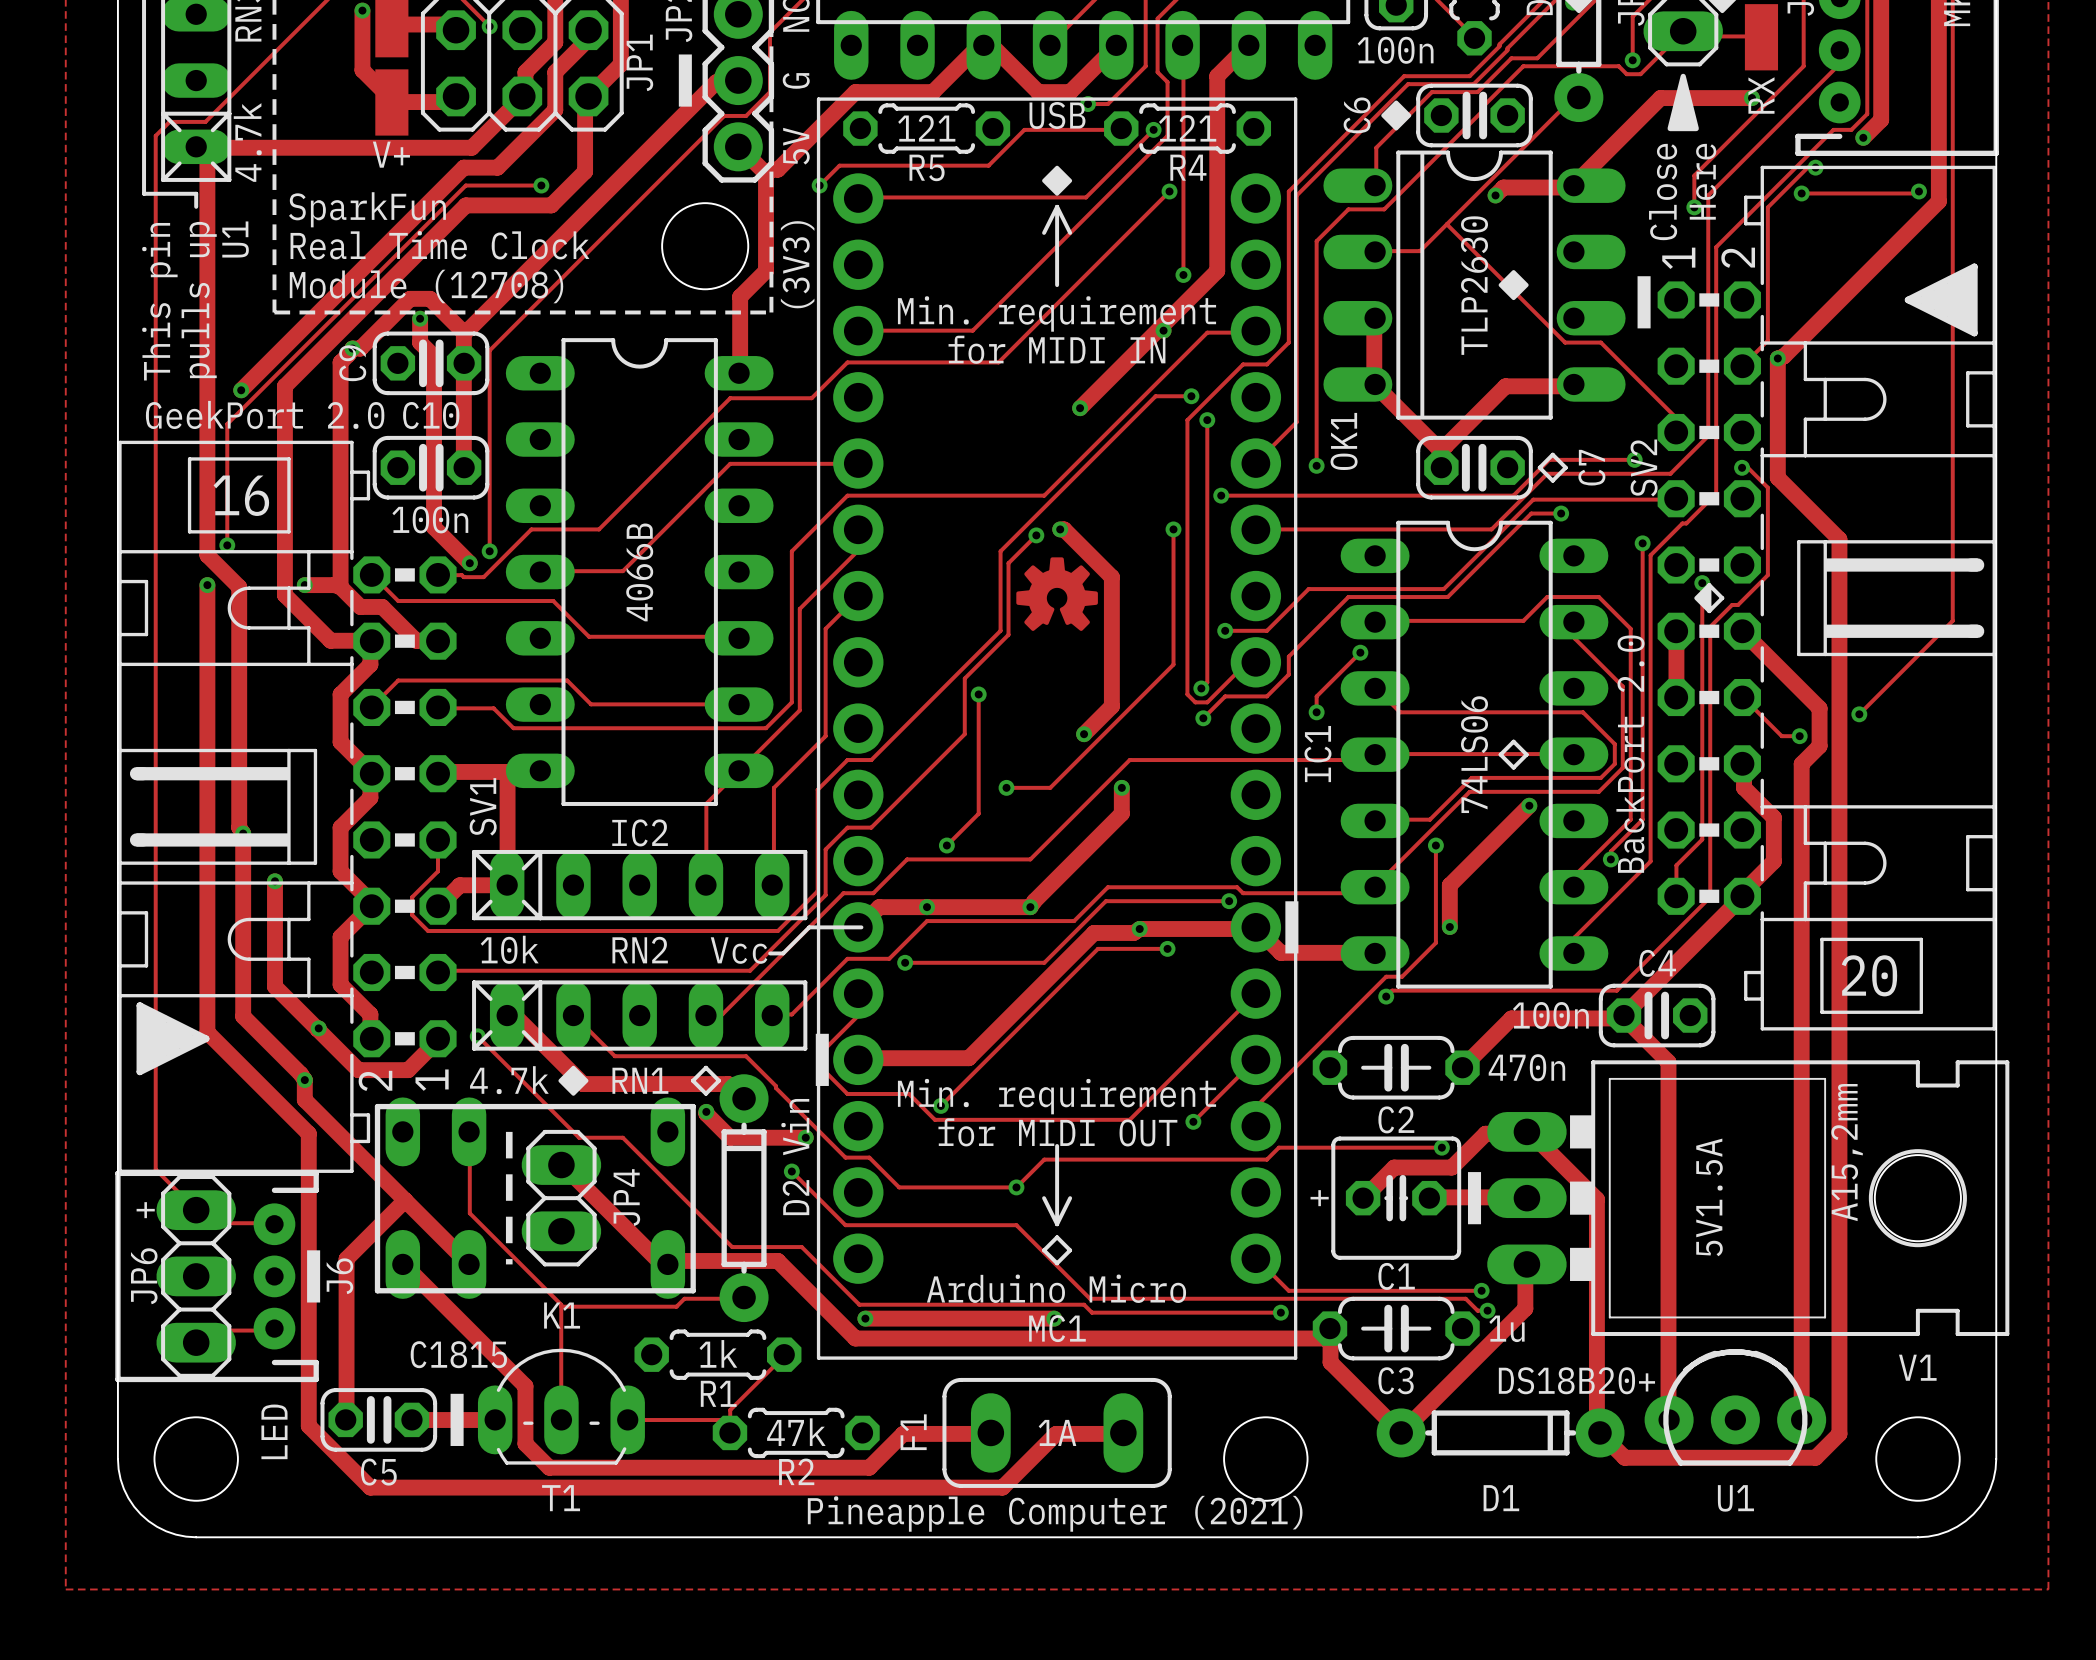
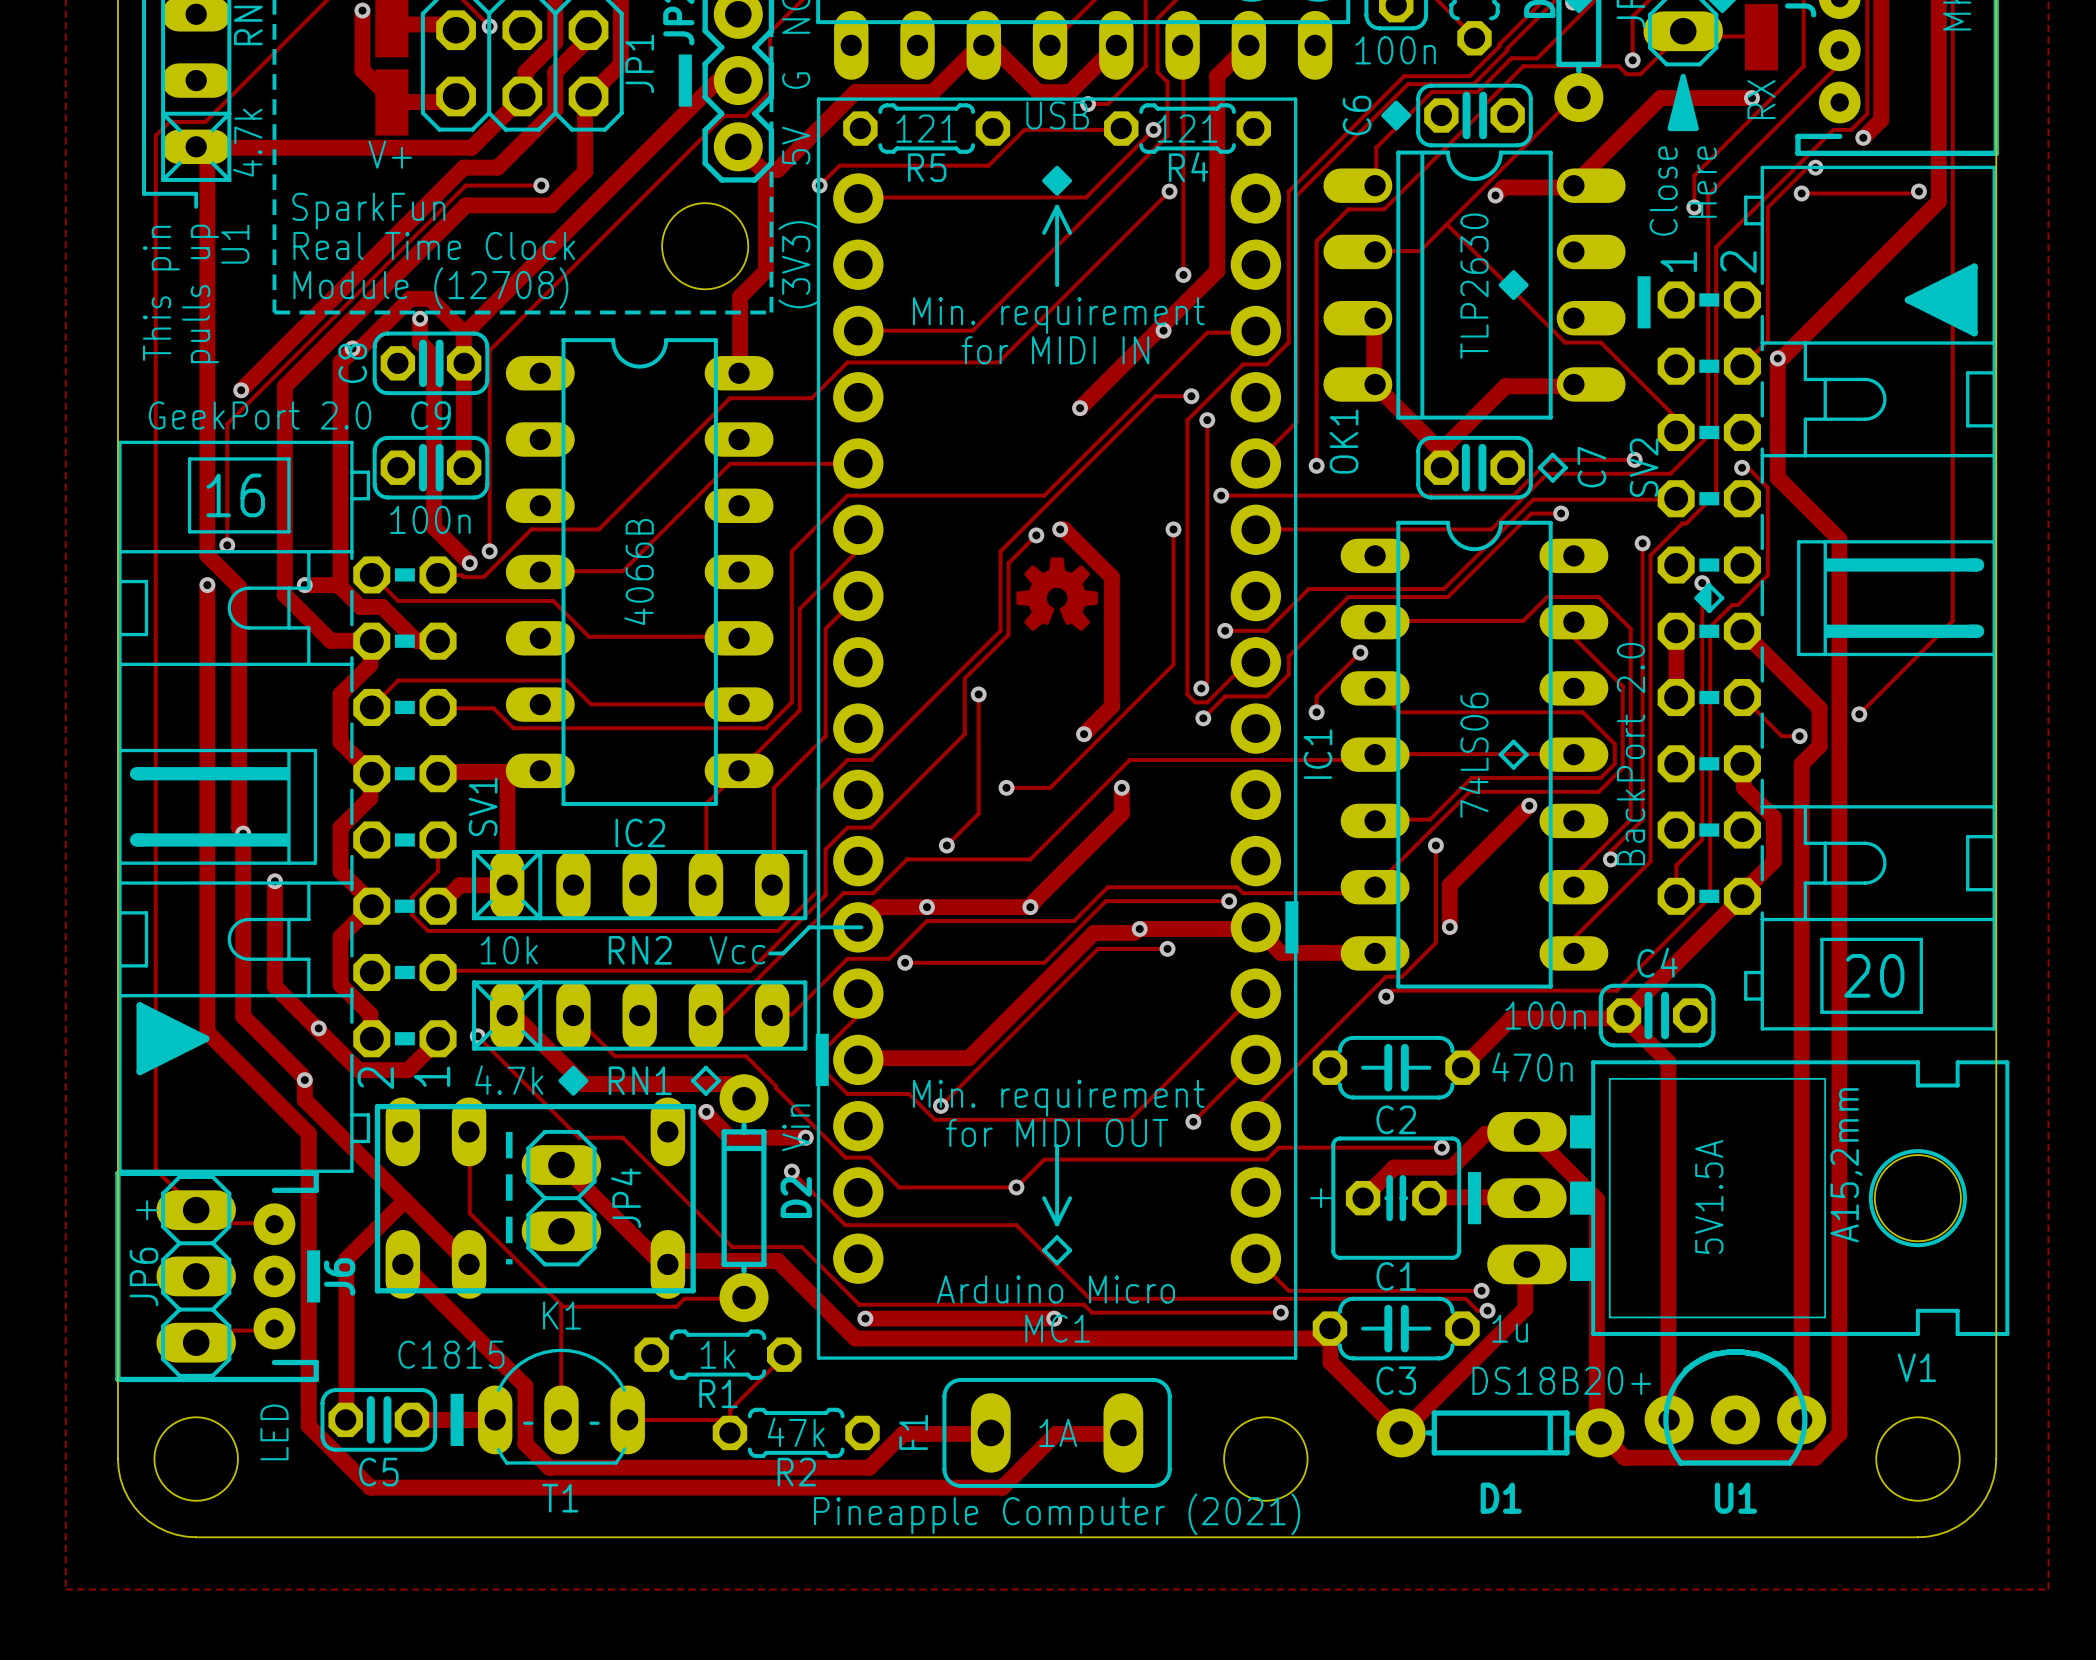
C9 name: C9 (352, 363) -> C8 (352, 363)
C10 name: C10 (431, 415) -> C9 (431, 415)

